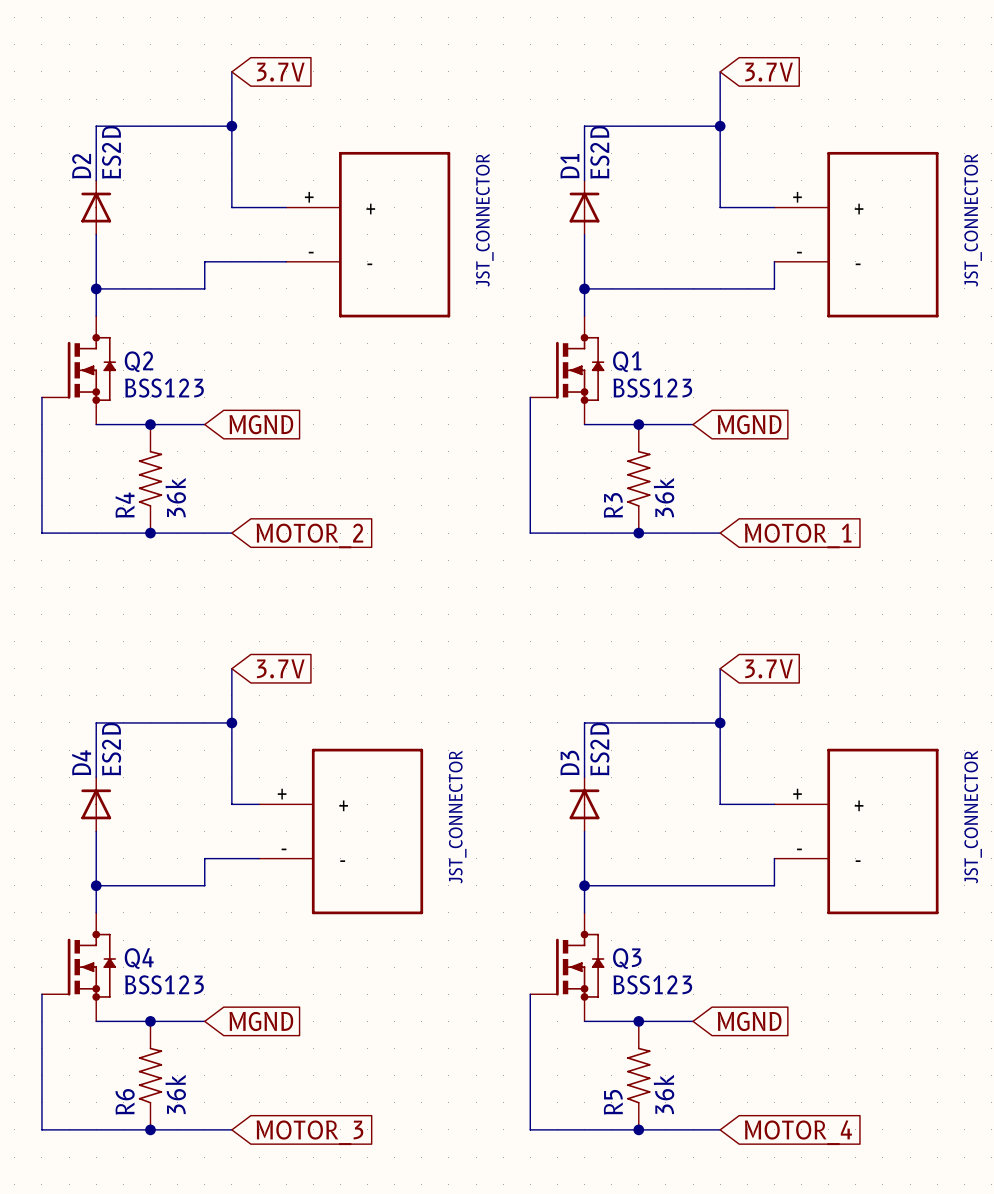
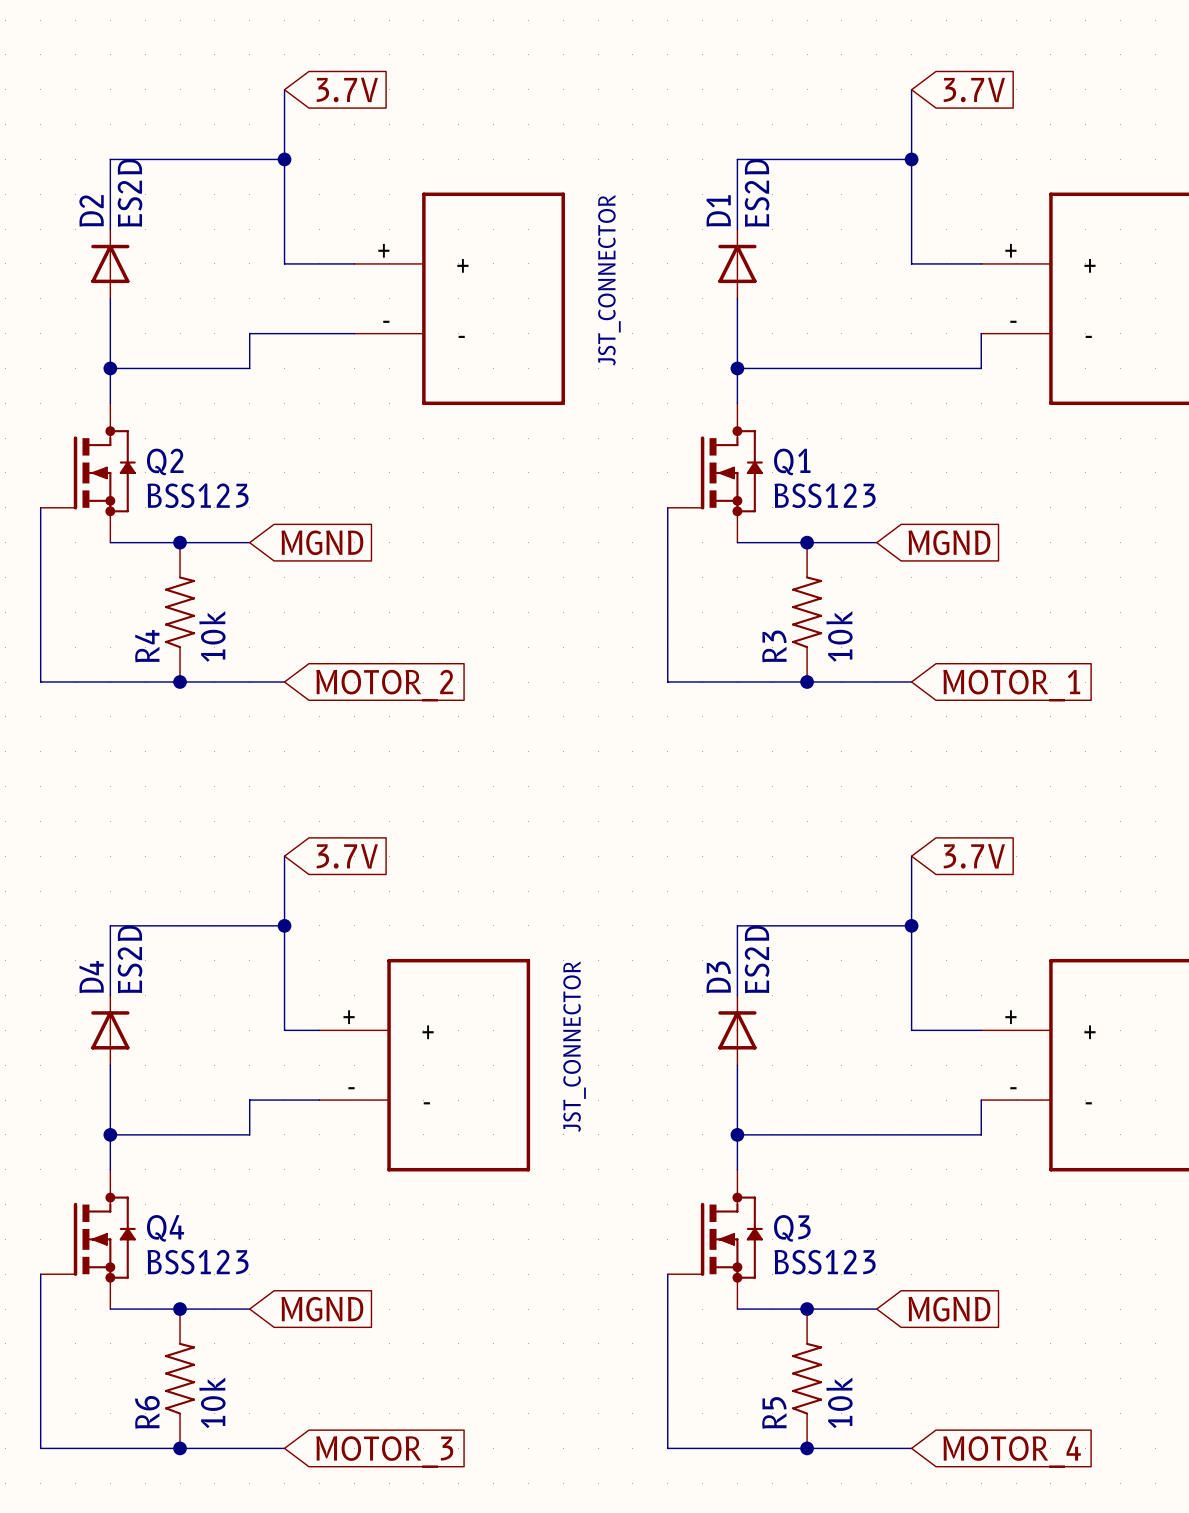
R4 value: 36k (175, 497) -> 10k (212, 636)
R3 value: 36k (664, 497) -> 10k (839, 636)
R6 value: 36k (175, 1094) -> 10k (212, 1402)
R5 value: 36k (664, 1094) -> 10k (839, 1402)

